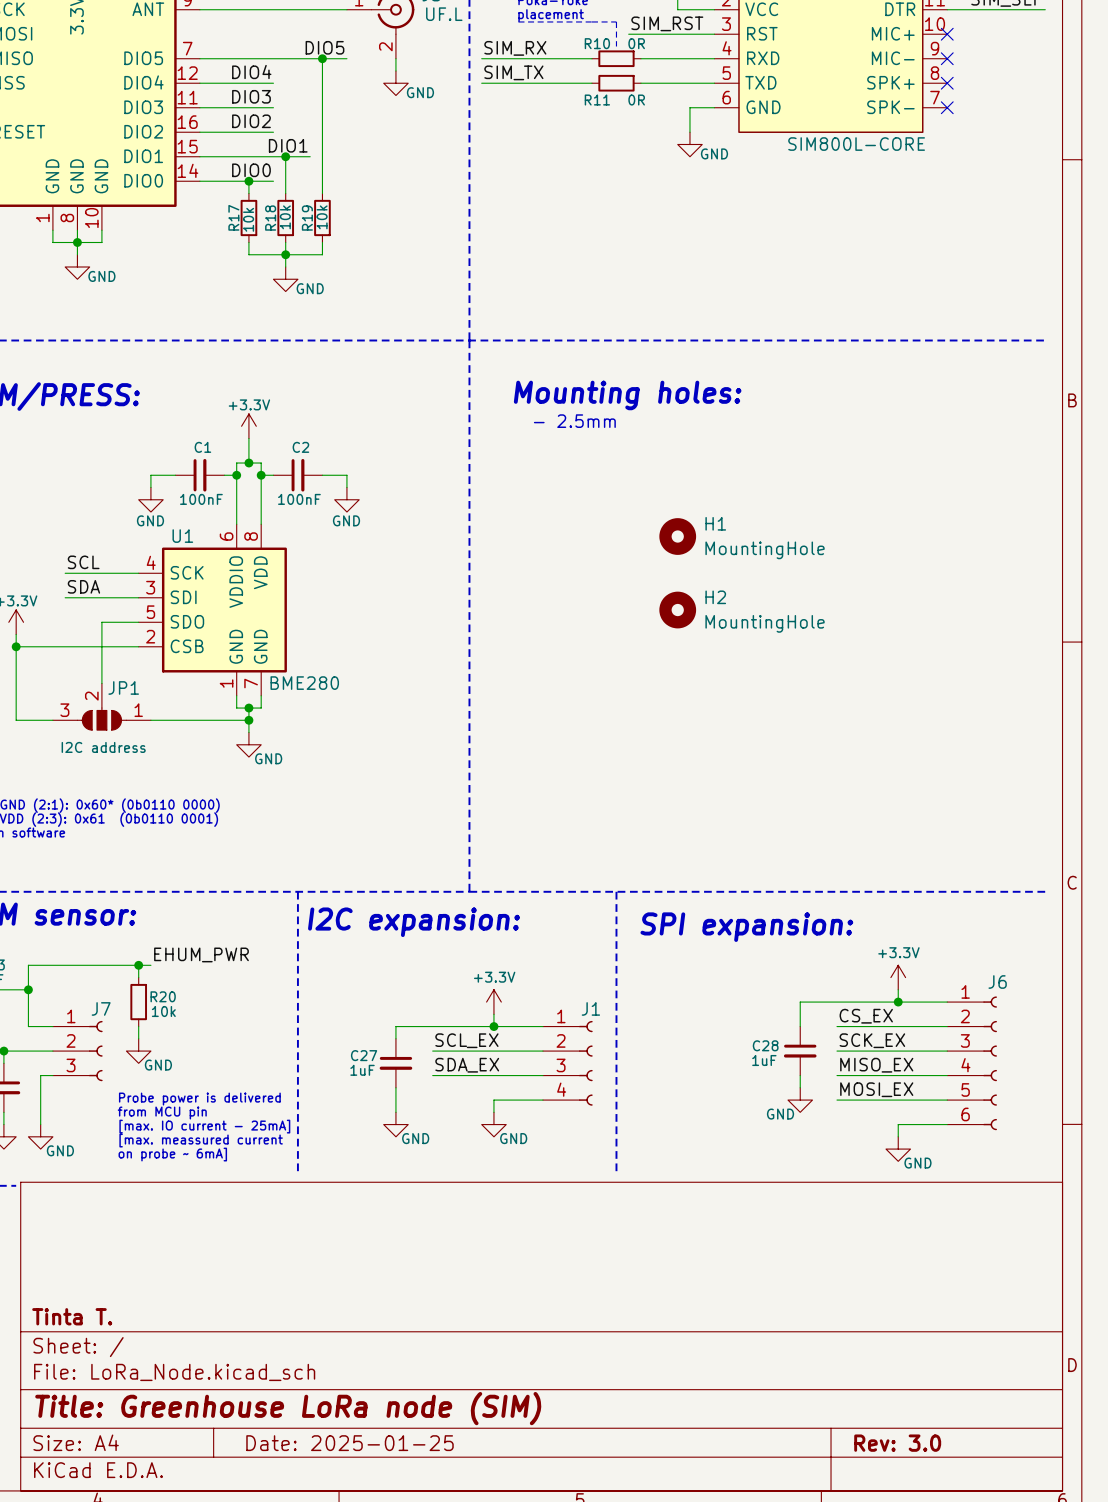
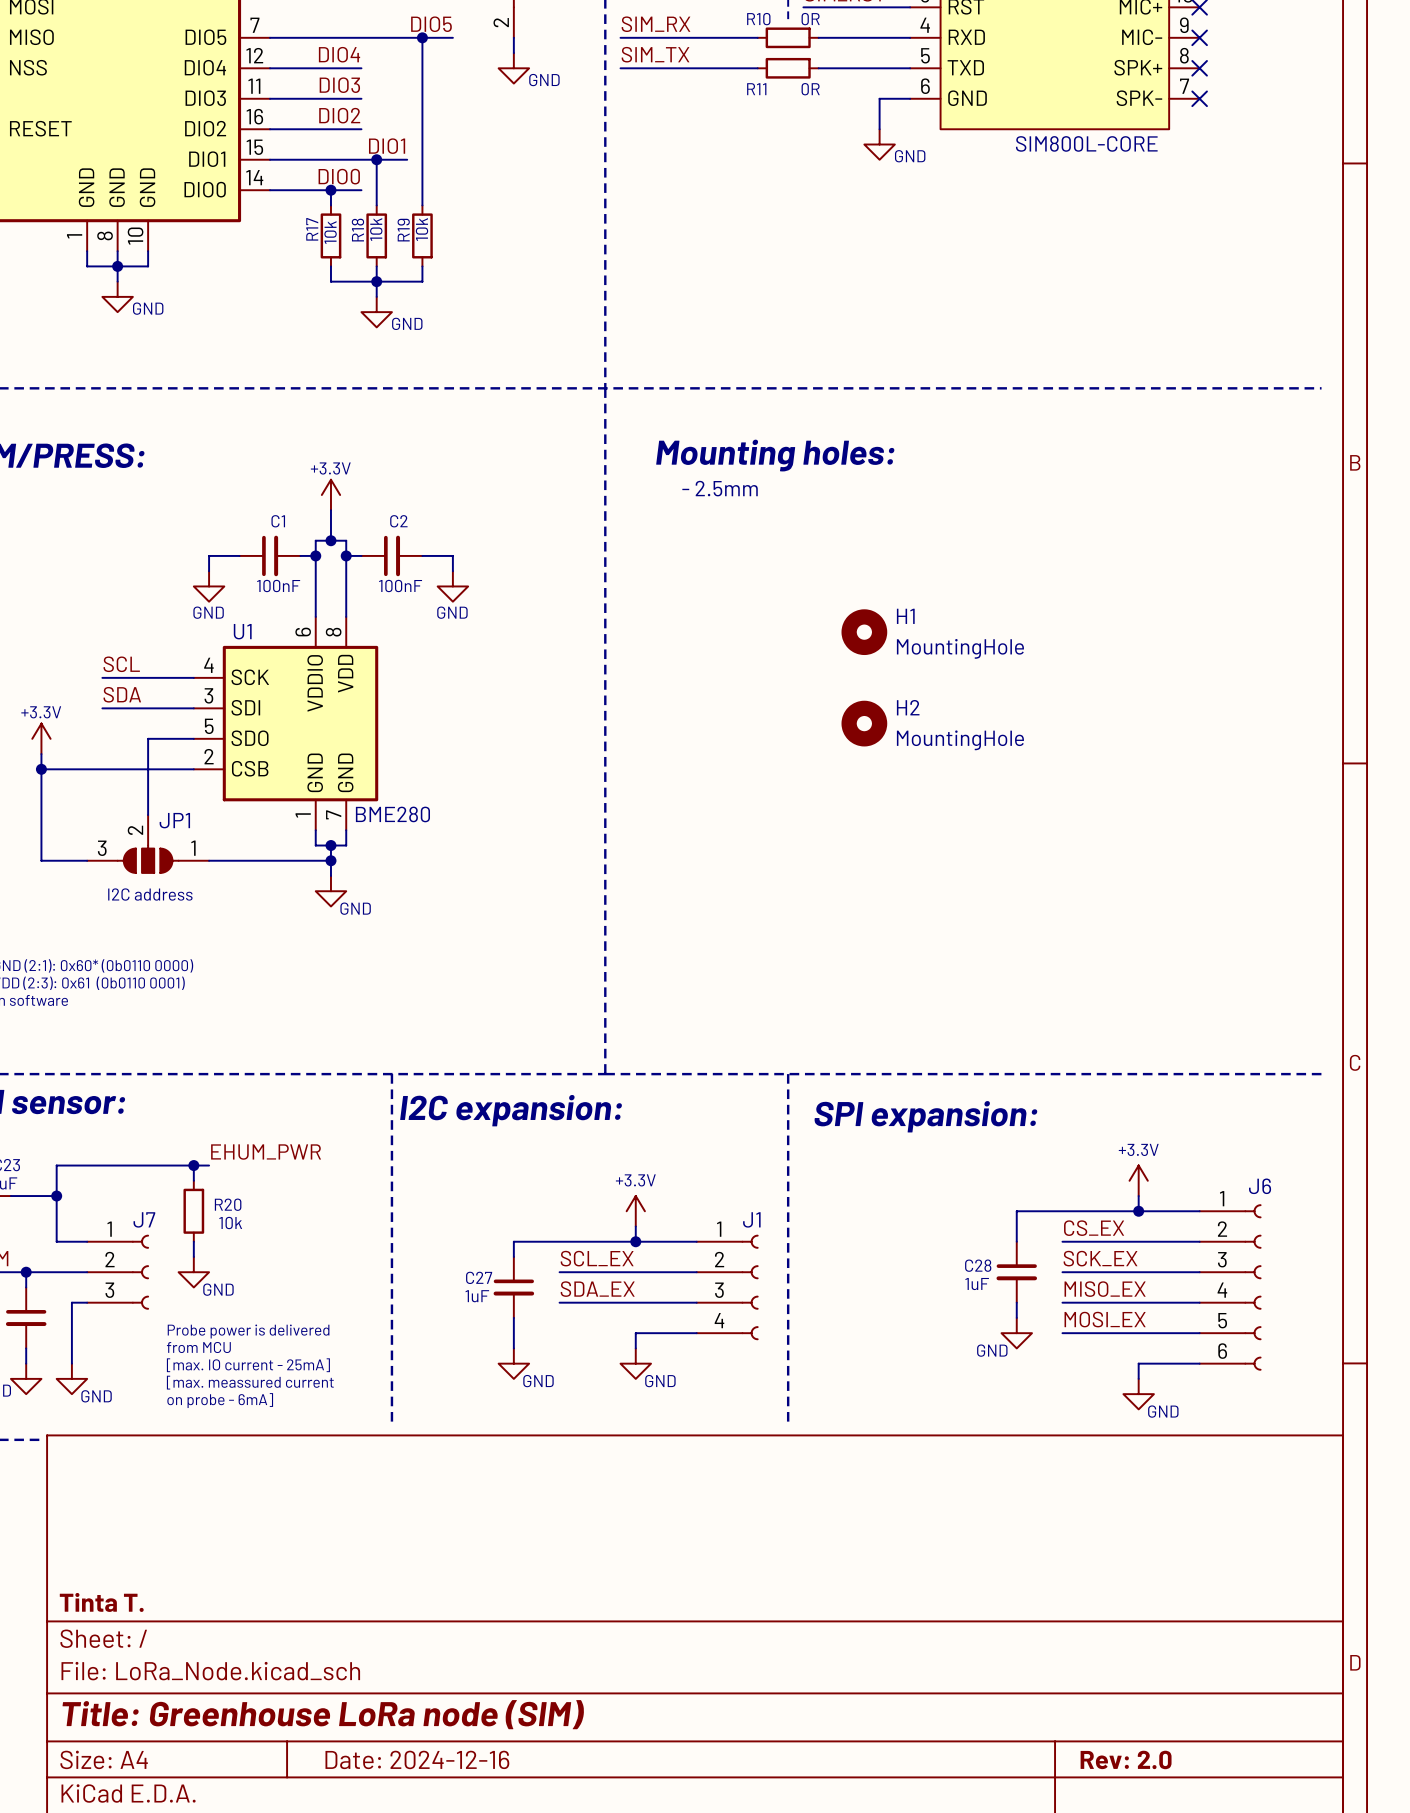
text: from MCU pin (162, 1113) -> from MCU (198, 1347)
text: on probe ~ 6mA] (172, 1154) -> on probe - 6mA] (220, 1400)
title block: Date: 2025-01-25 (350, 1443) -> Date: 2024-12-16 (417, 1759)
title block: Rev: 3.0 (897, 1443) -> Rev: 2.0 (1126, 1759)

